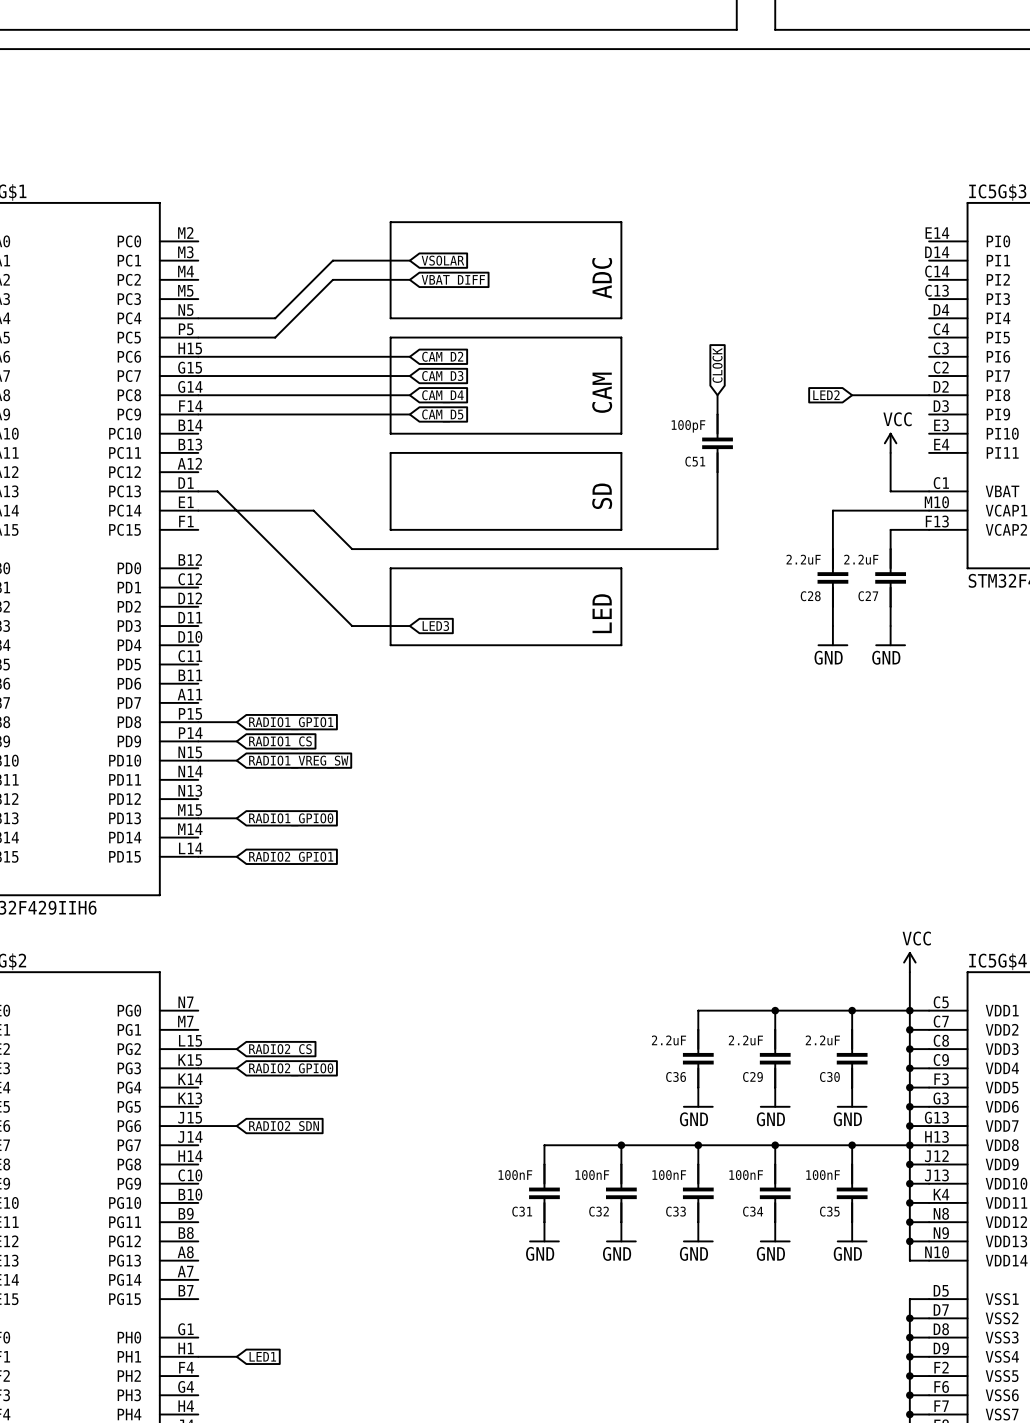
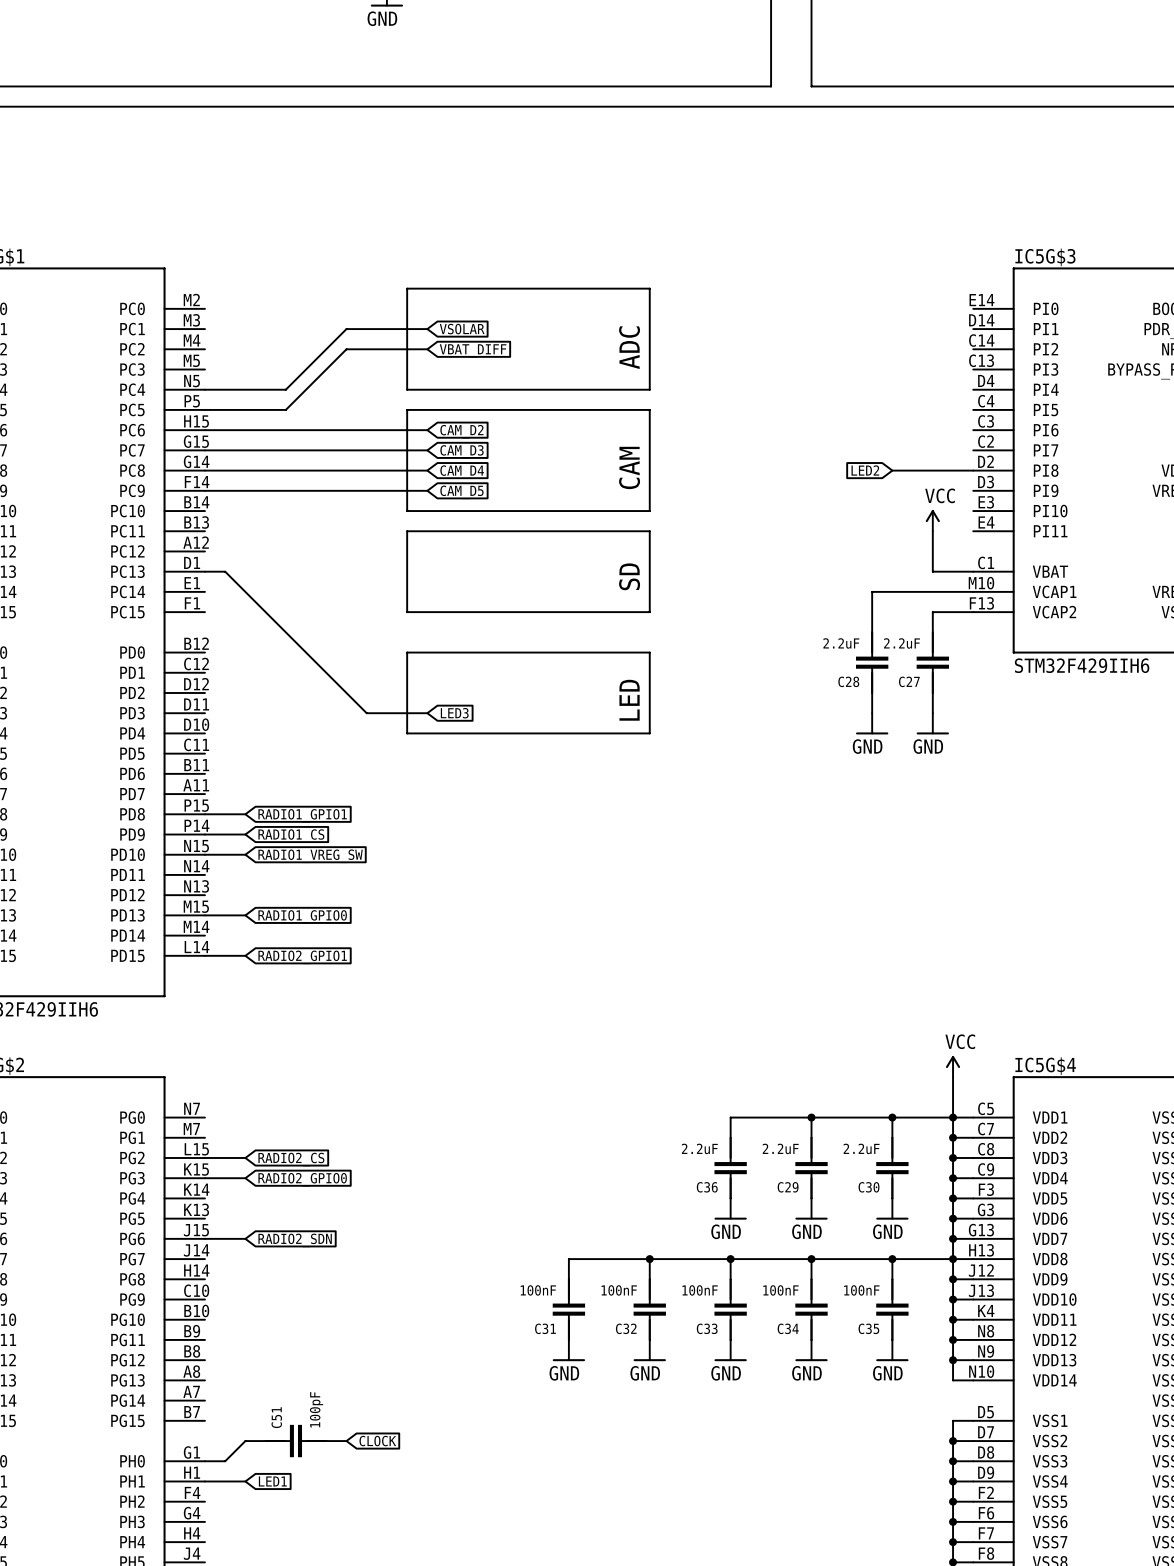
global label: CLOCK (717, 365) -> none
wire: (717, 395) (717, 414) -> none
C51 rotation: 0° (717, 443) -> 90° clockwise (295, 1441)
C51 position: (717, 443) -> (295, 1441)
wire: (717, 472) (717, 549) (352, 549) (313, 510) (198, 510) -> none
wire: none -> (265, 1441) (245, 1441) (225, 1461) (204, 1461)
wire: none -> (326, 1441) (346, 1441)
global label: none -> CLOCK (377, 1441)

